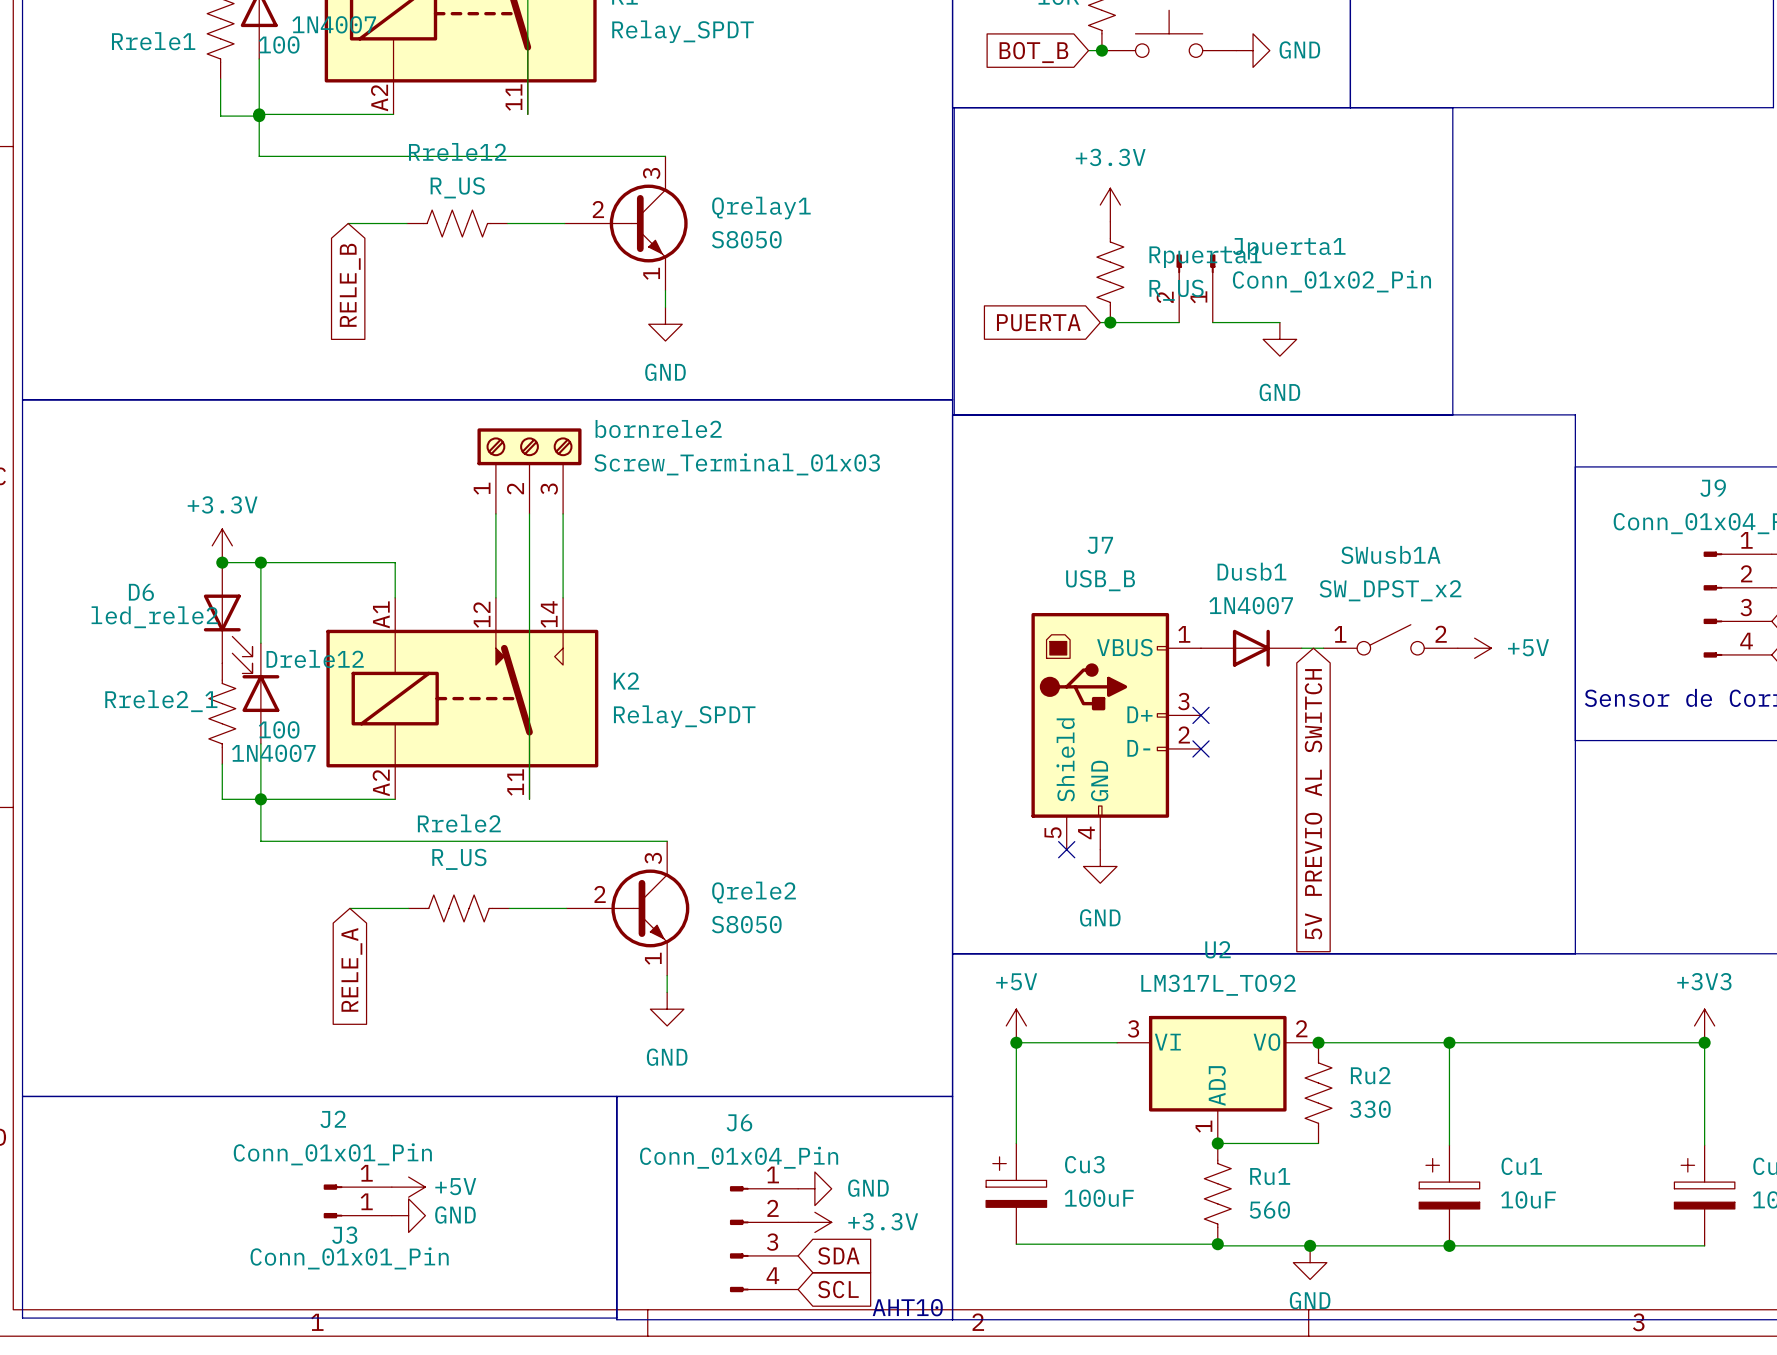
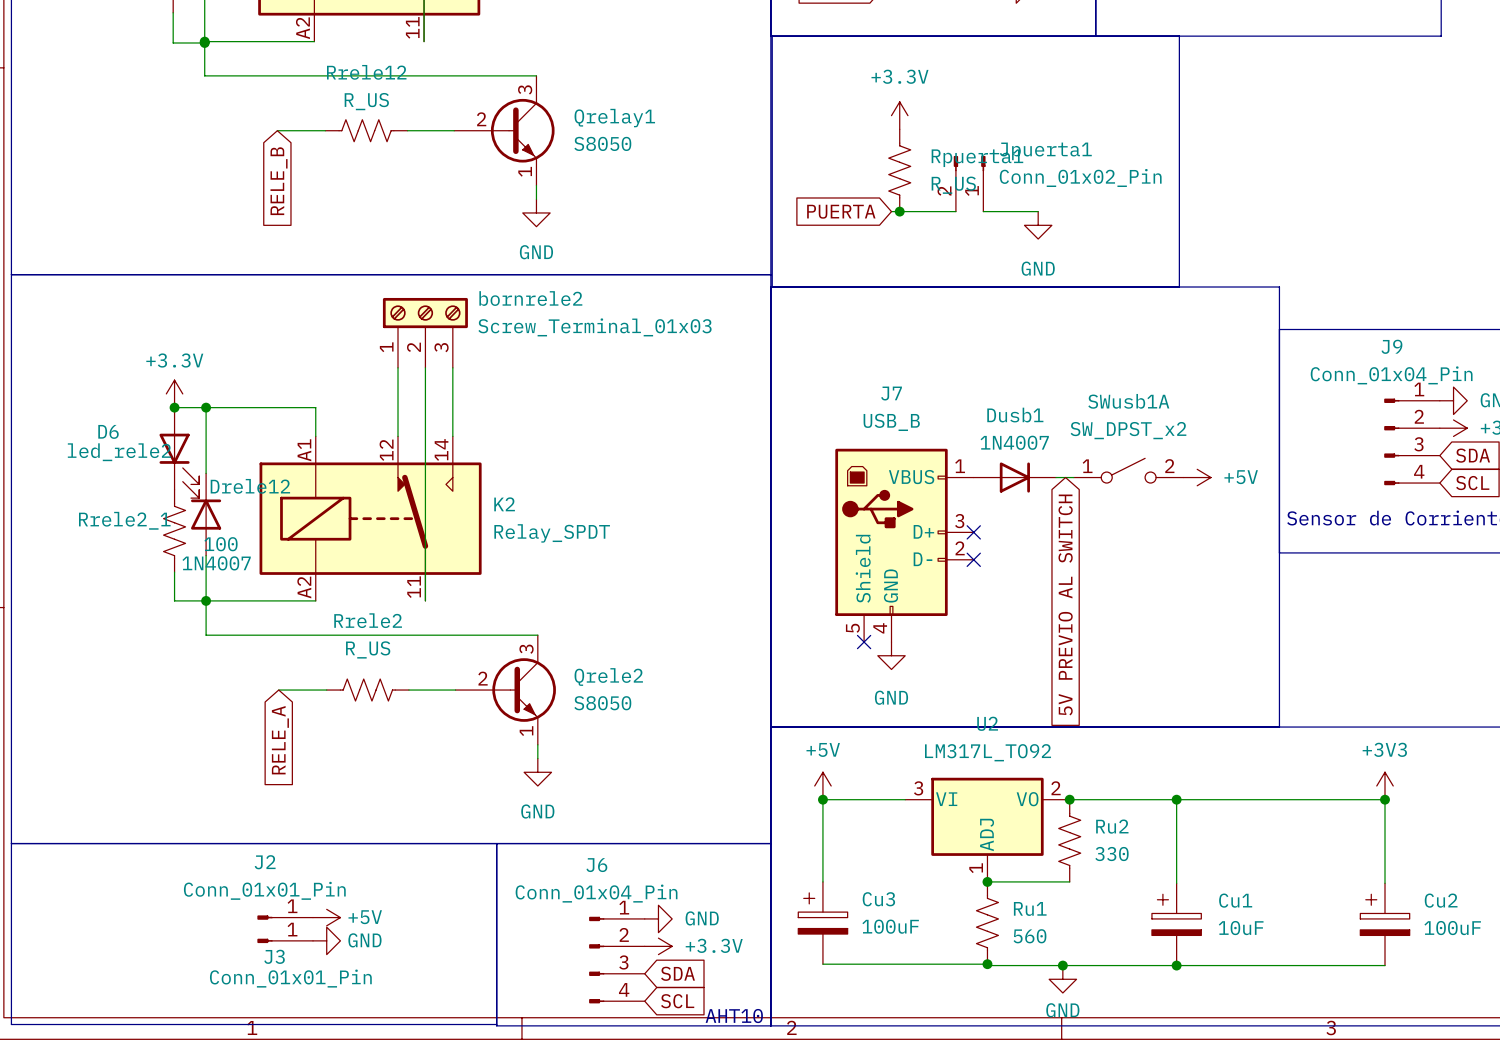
J3 value position: Conn_01x01_Pin (349, 1258) -> Conn_01x01_Pin (290, 978)

